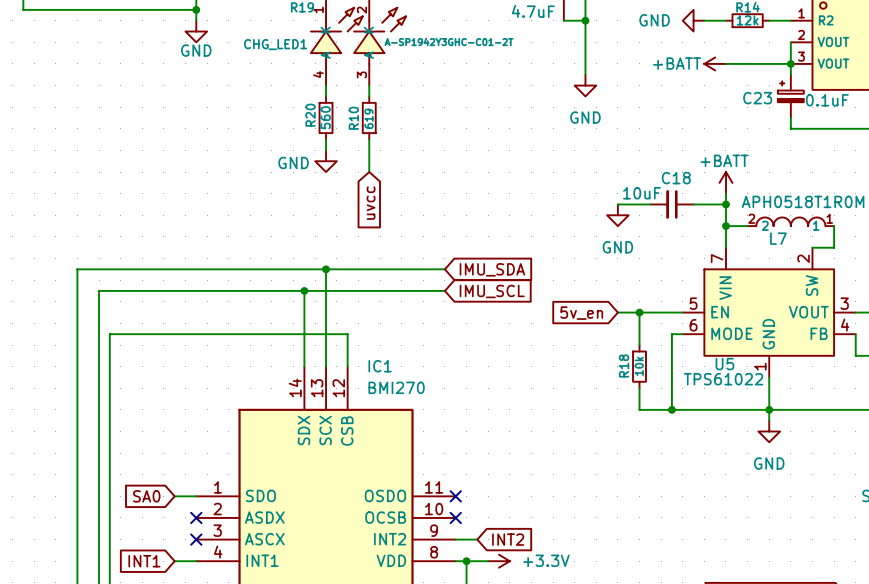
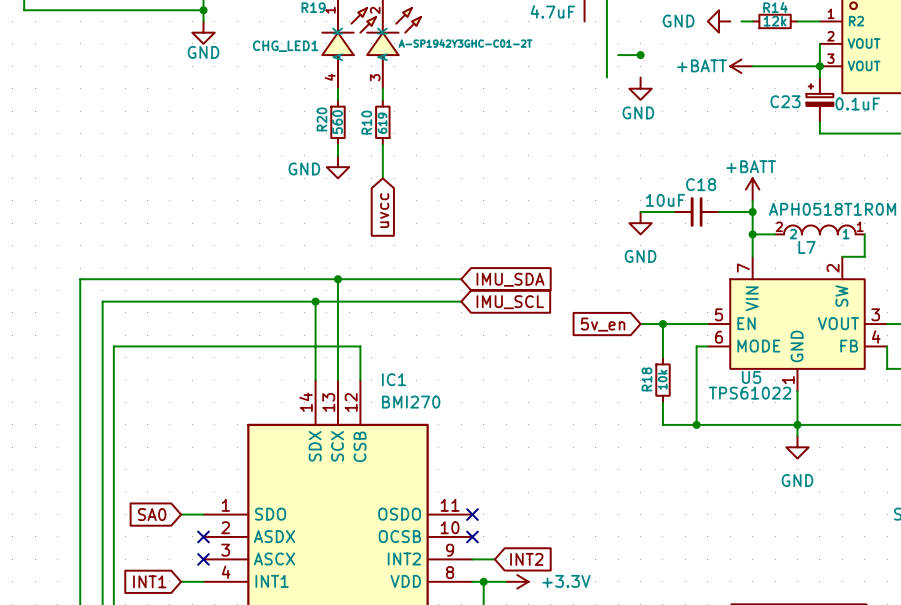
wire: (563, 20) (585, 20) -> (618, 55) (640, 55)
junction: (585, 20) -> none
wire: (704, 20) (715, 20) -> none
junction: none -> (640, 55)
power symbol position: GND (585, 85) -> GND (640, 88)
power symbol text position: GND (585, 117) -> GND (638, 112)

